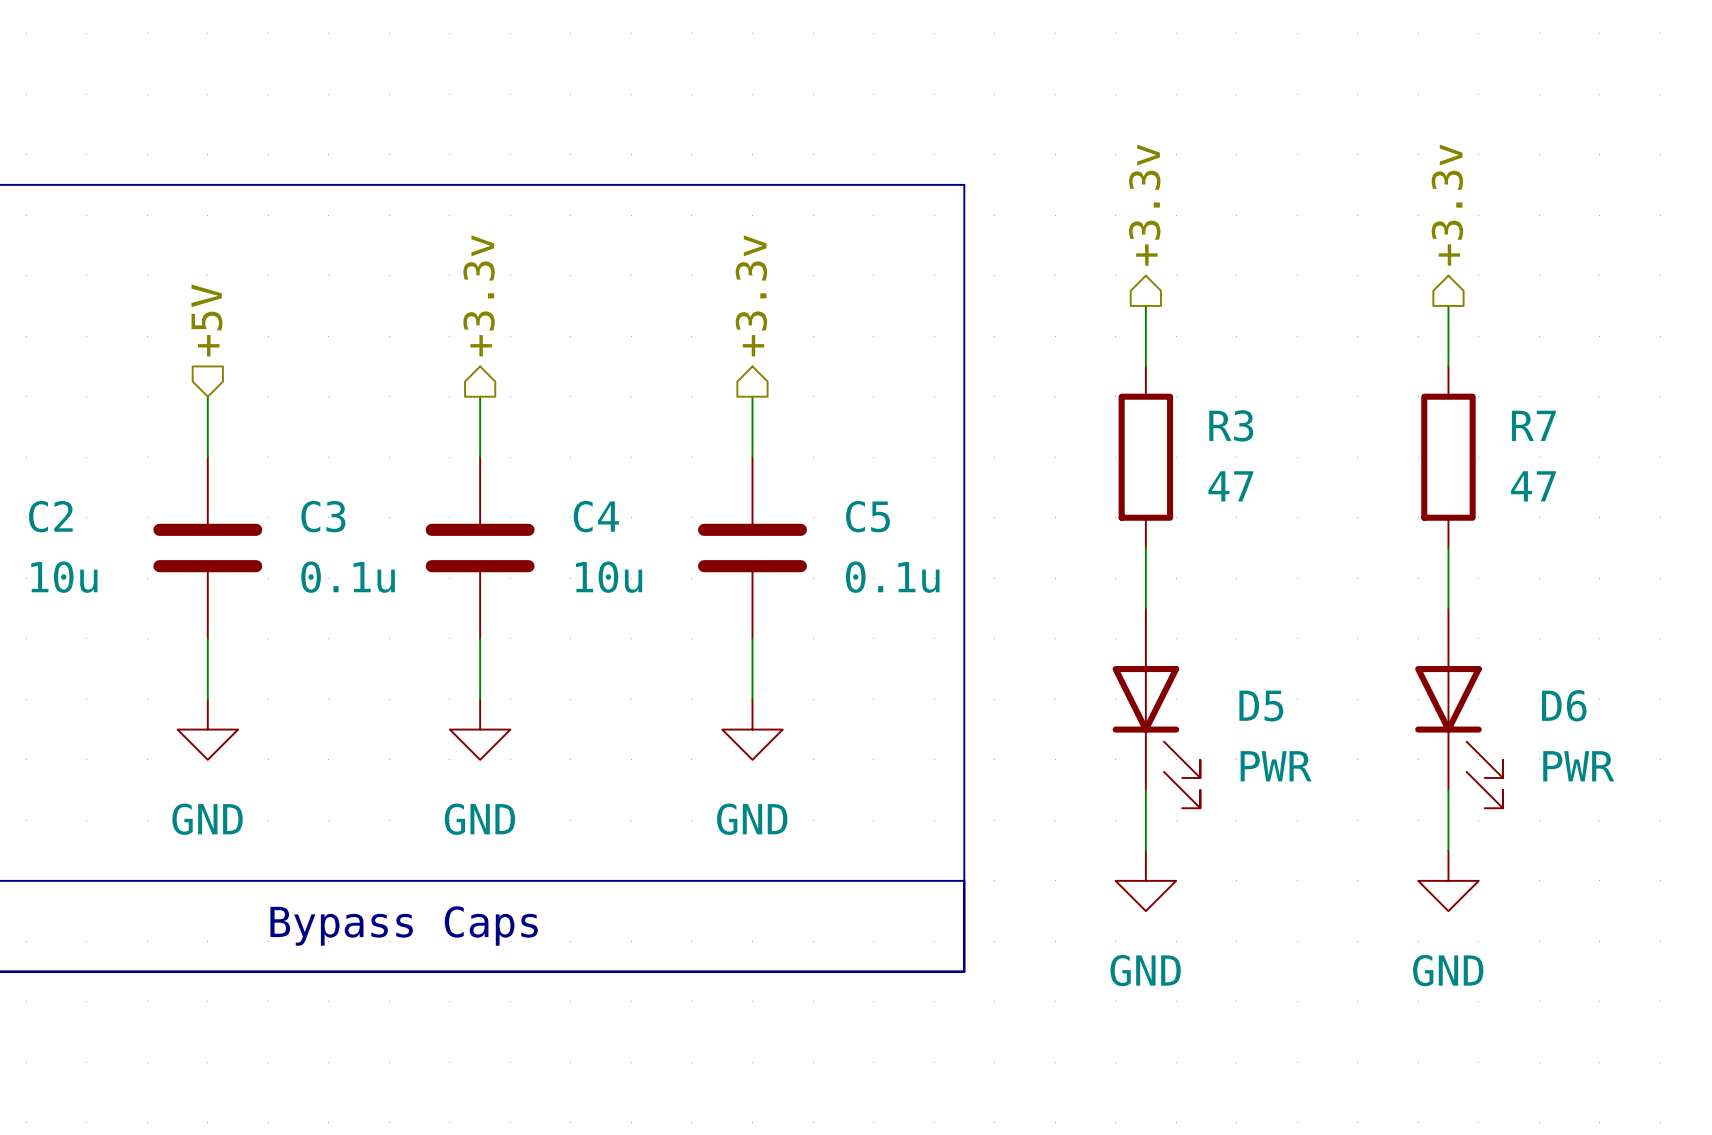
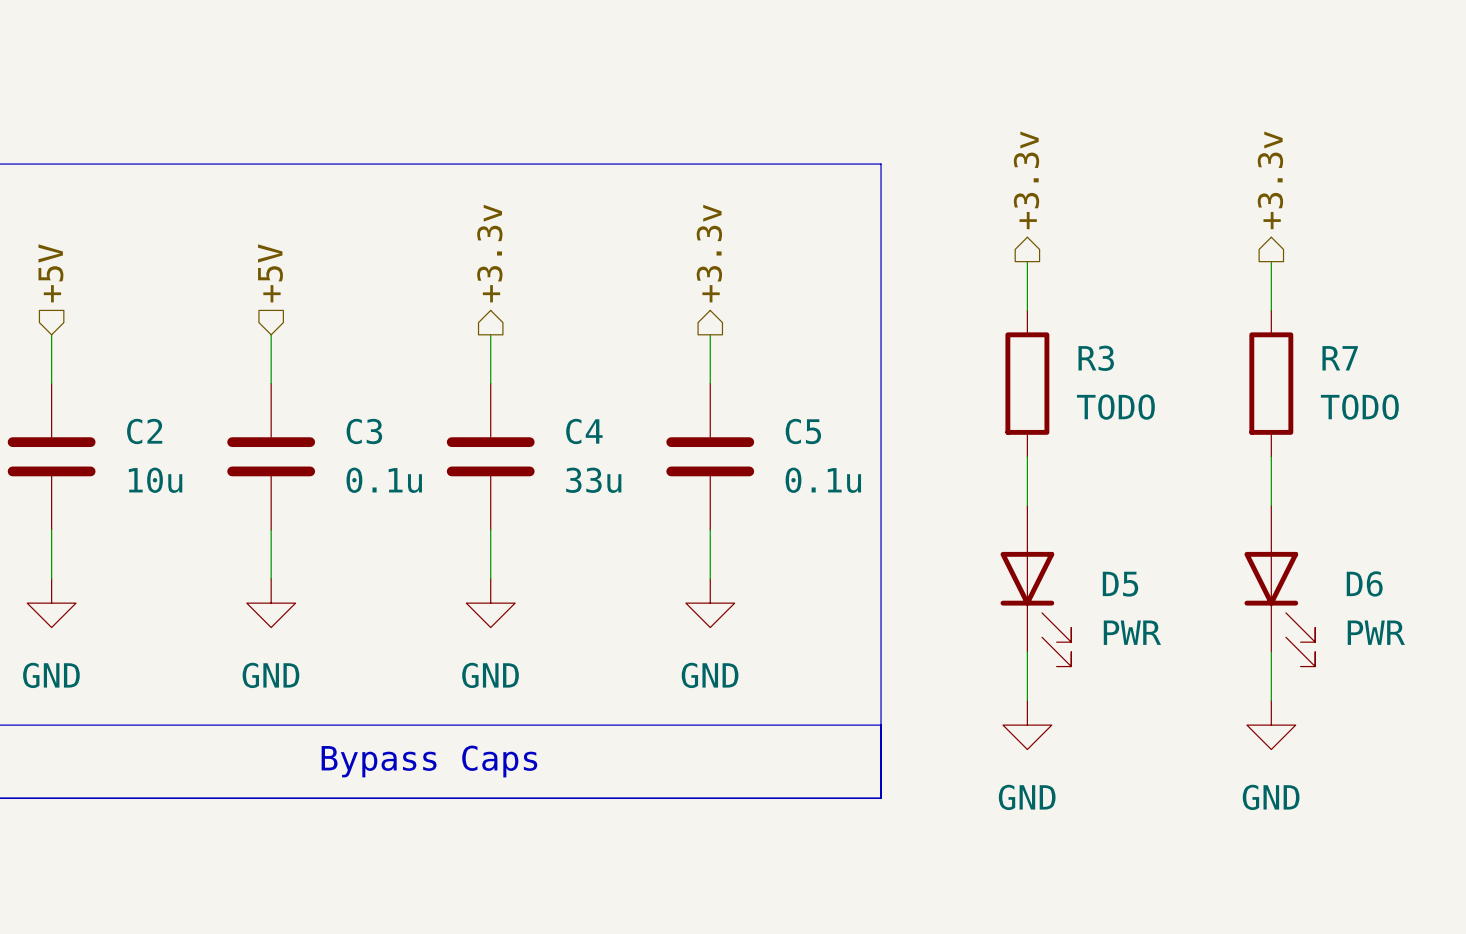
R3 value: 47 (1230, 486) -> TODO (1115, 407)
R7 value: 47 (1533, 486) -> TODO (1359, 407)
C4 value: 10u (609, 577) -> 33u (593, 480)

